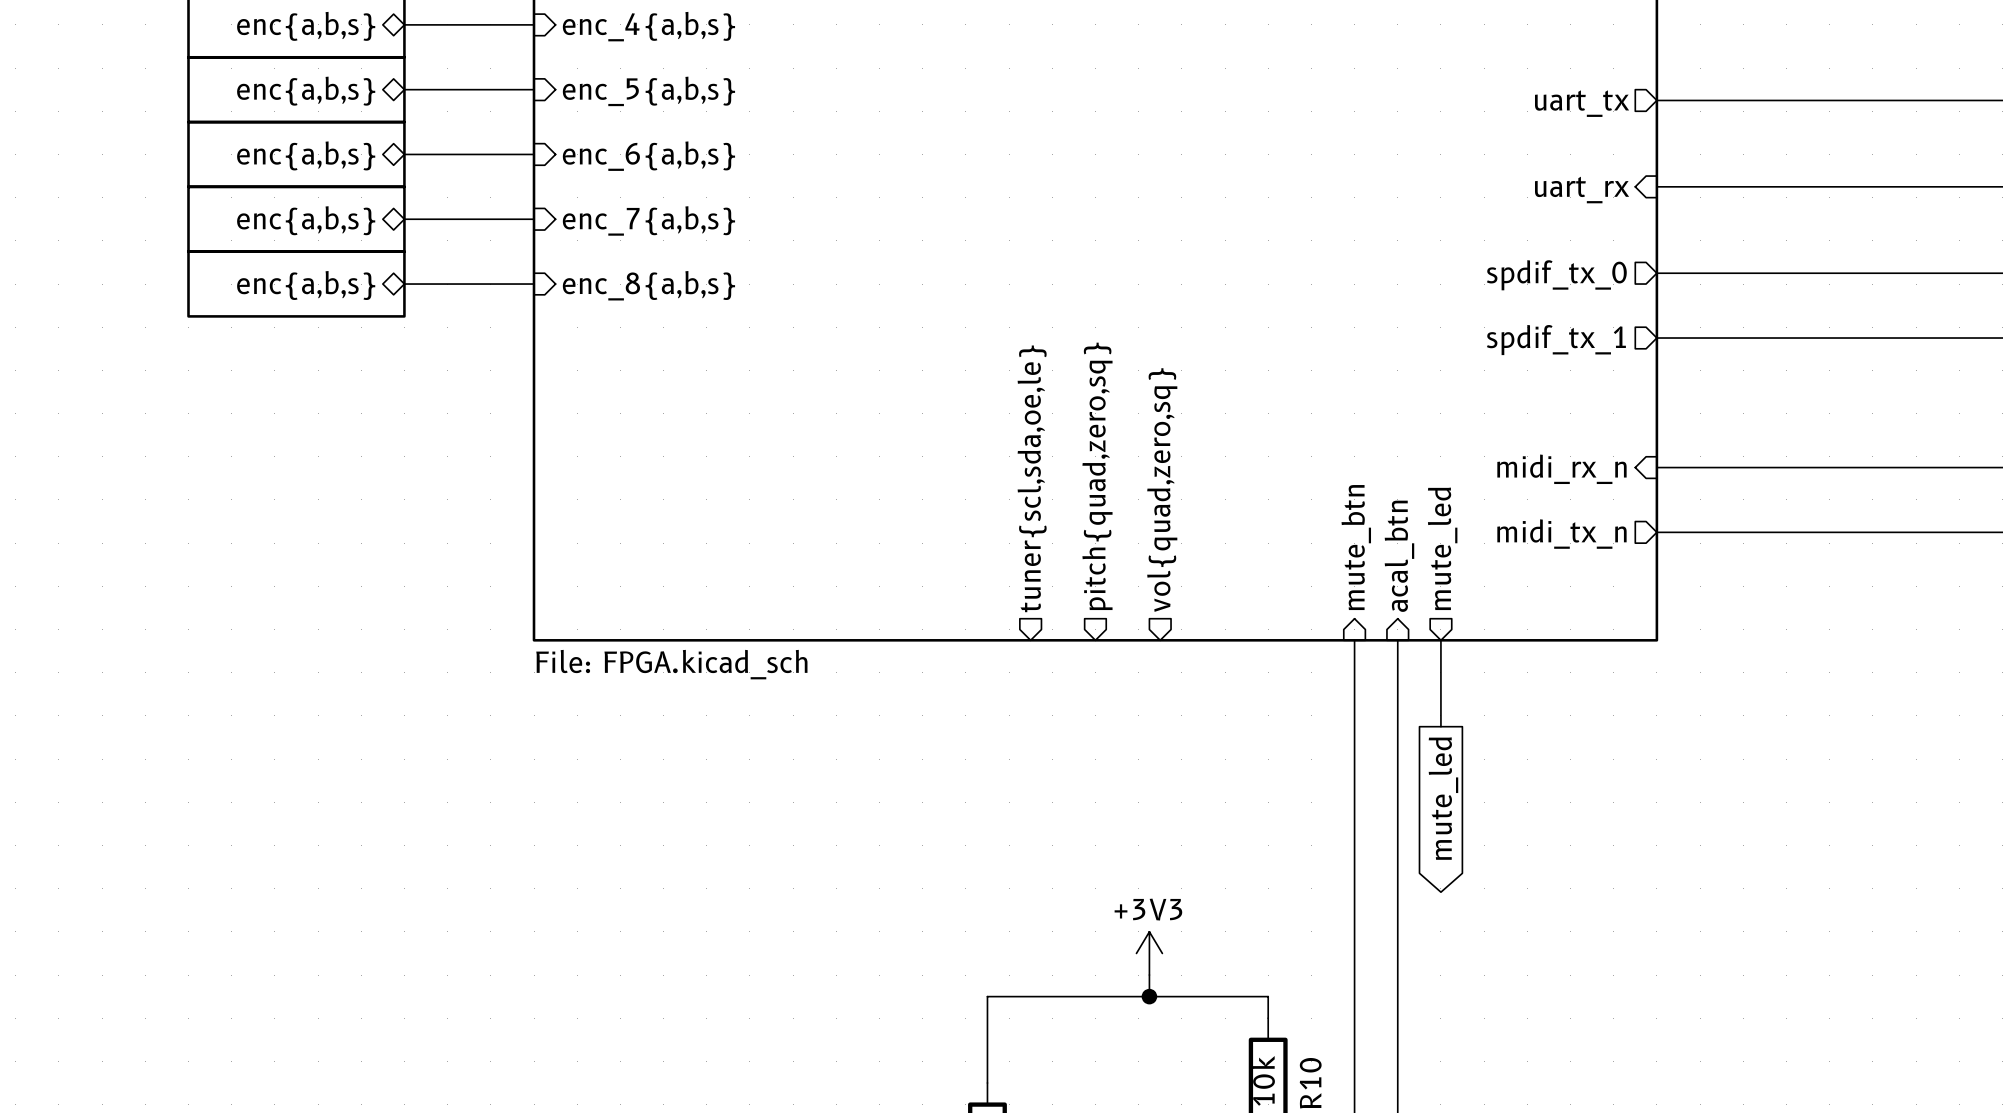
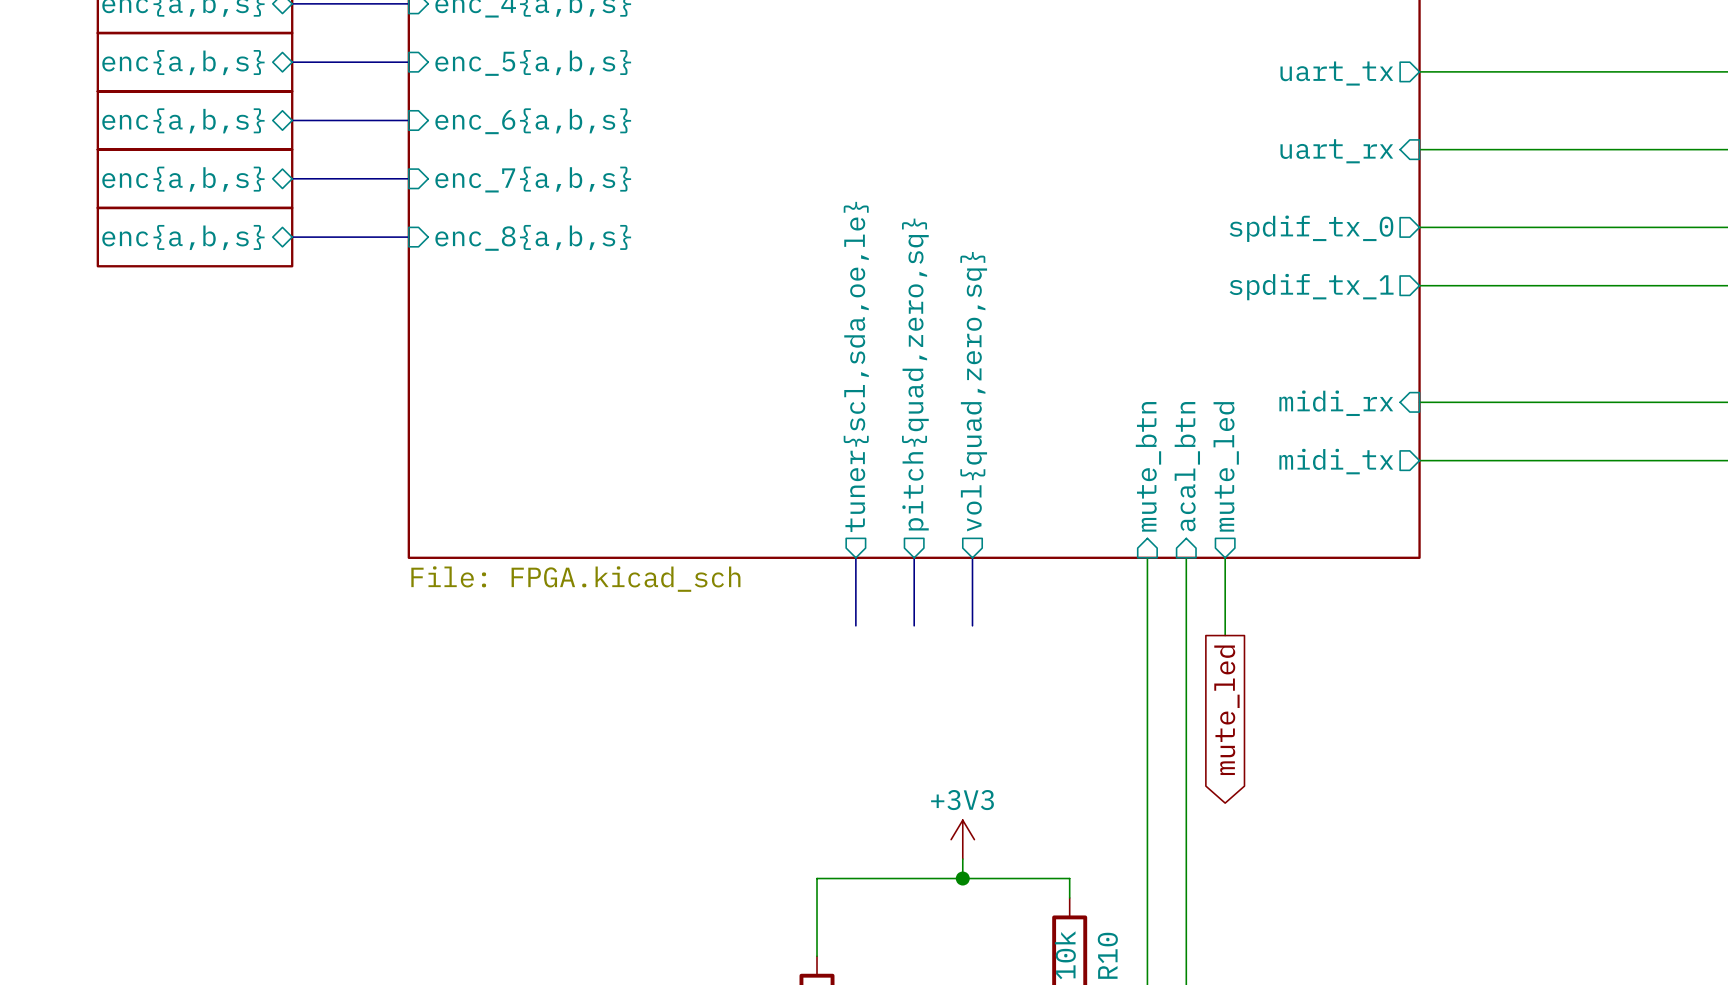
sheet pin: midi_rx_n (1561, 469) -> midi_rx (1336, 403)
sheet pin: midi_tx_n (1561, 534) -> midi_tx (1336, 461)
bus: none -> (855, 557) (855, 625)
bus: none -> (914, 557) (914, 625)
bus: none -> (972, 557) (972, 625)

